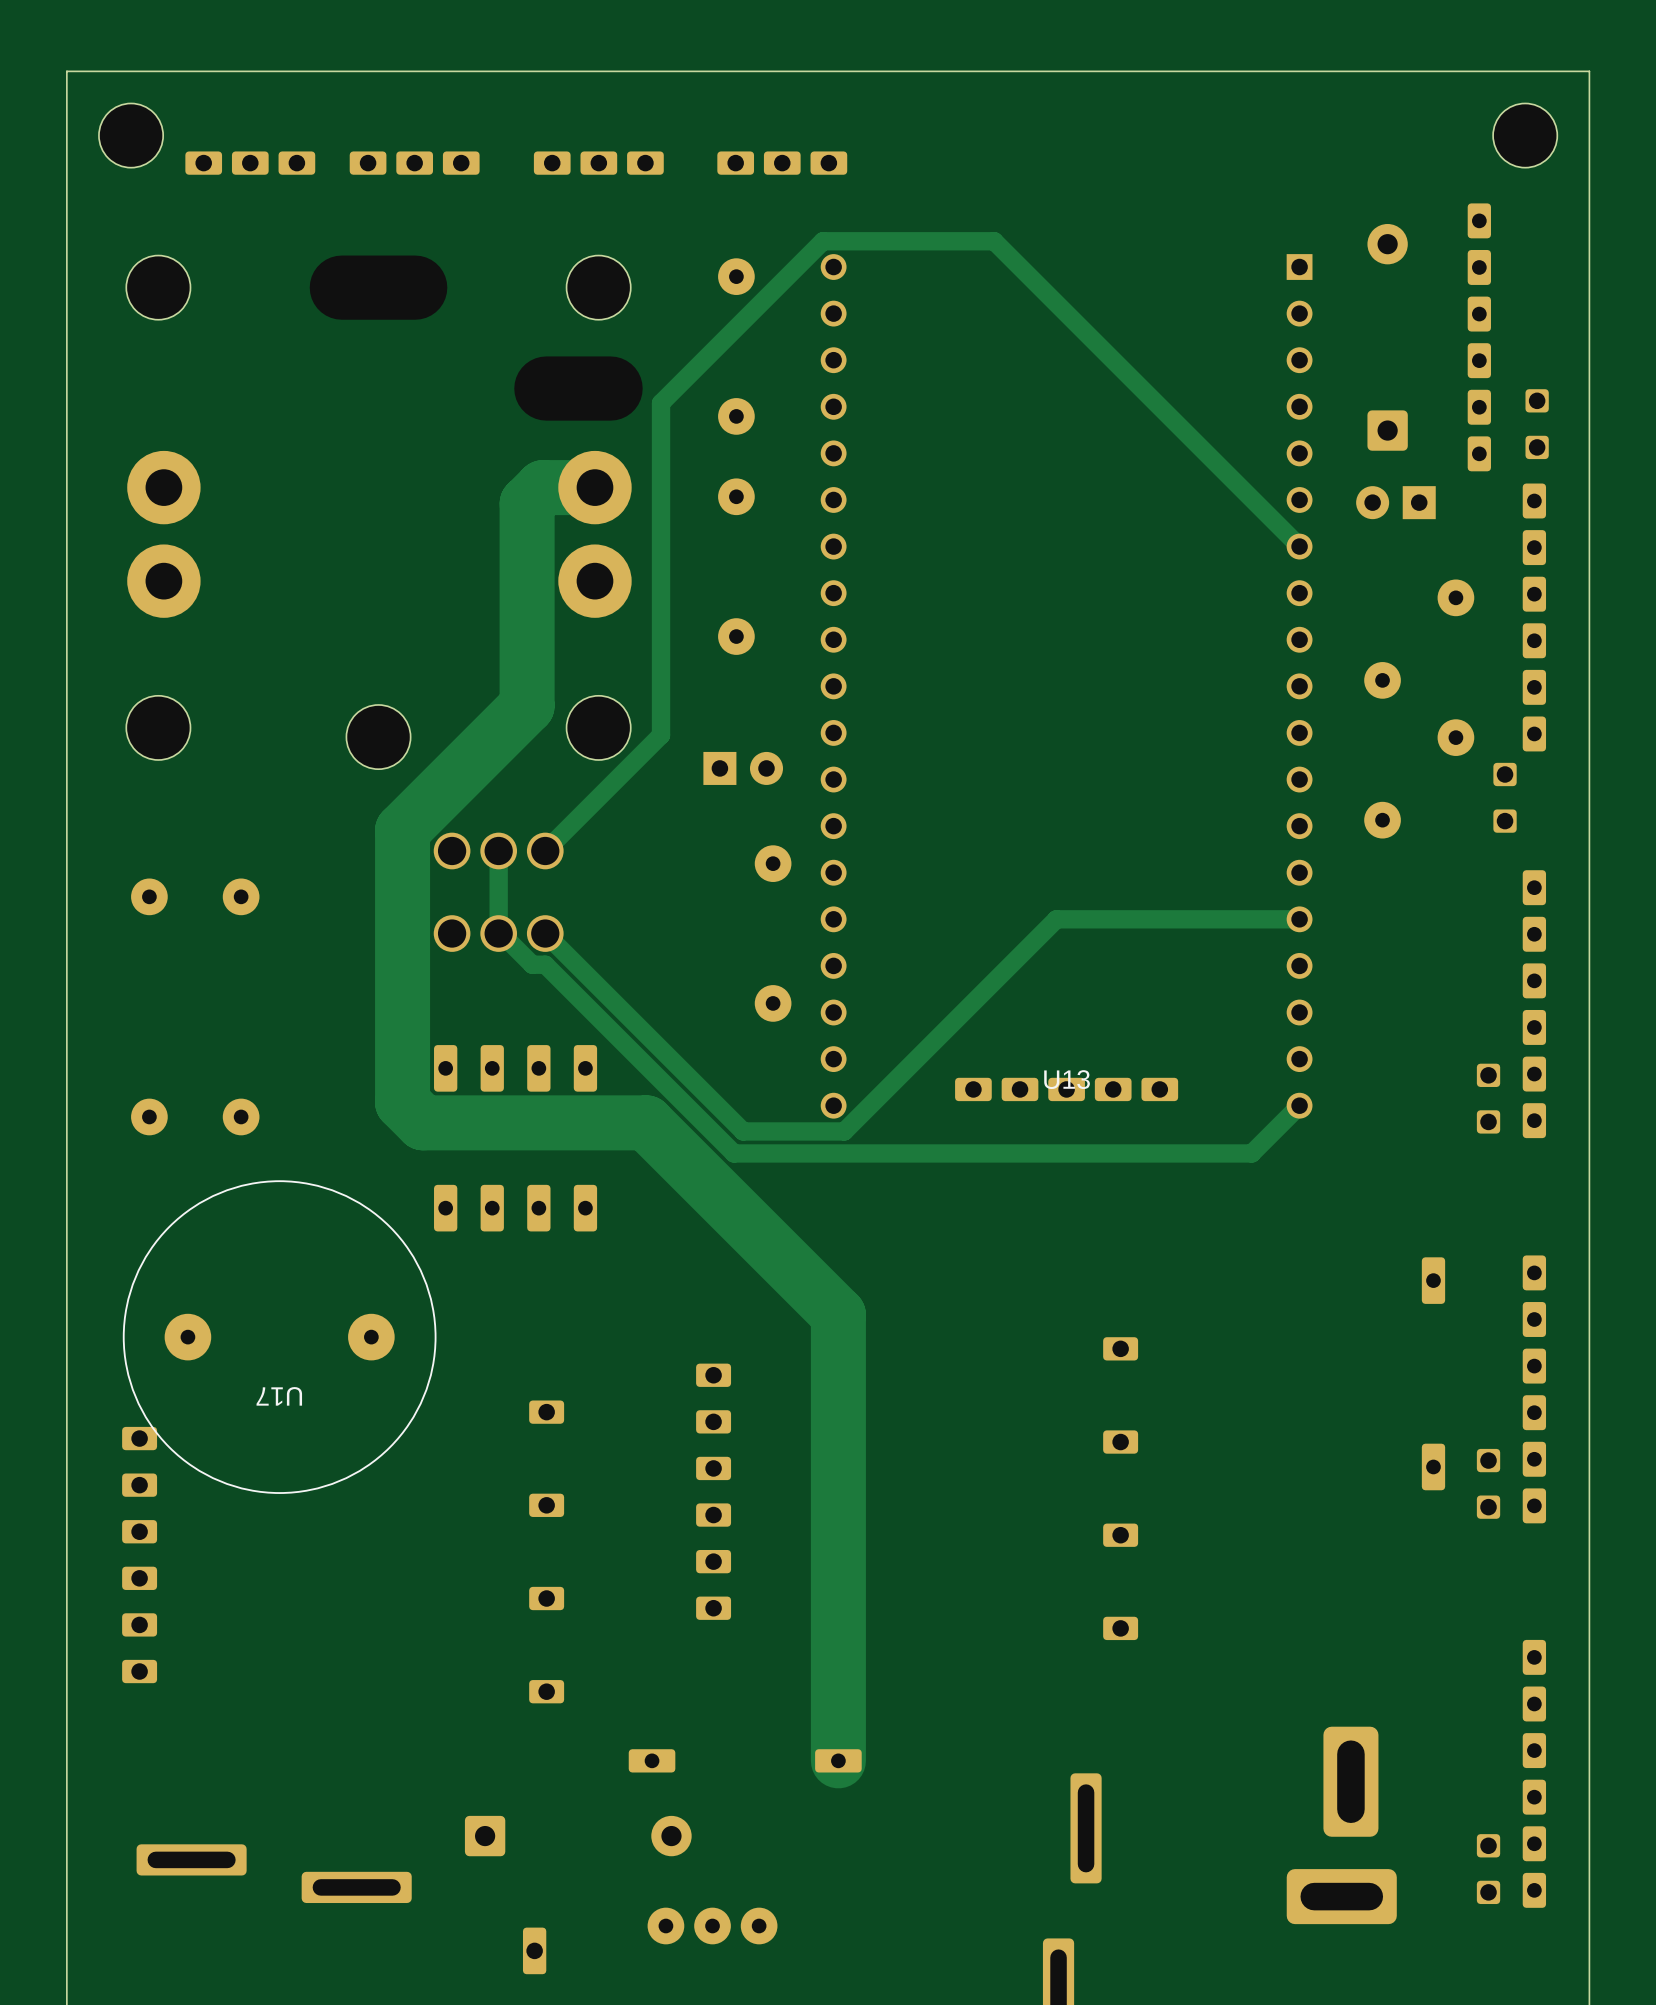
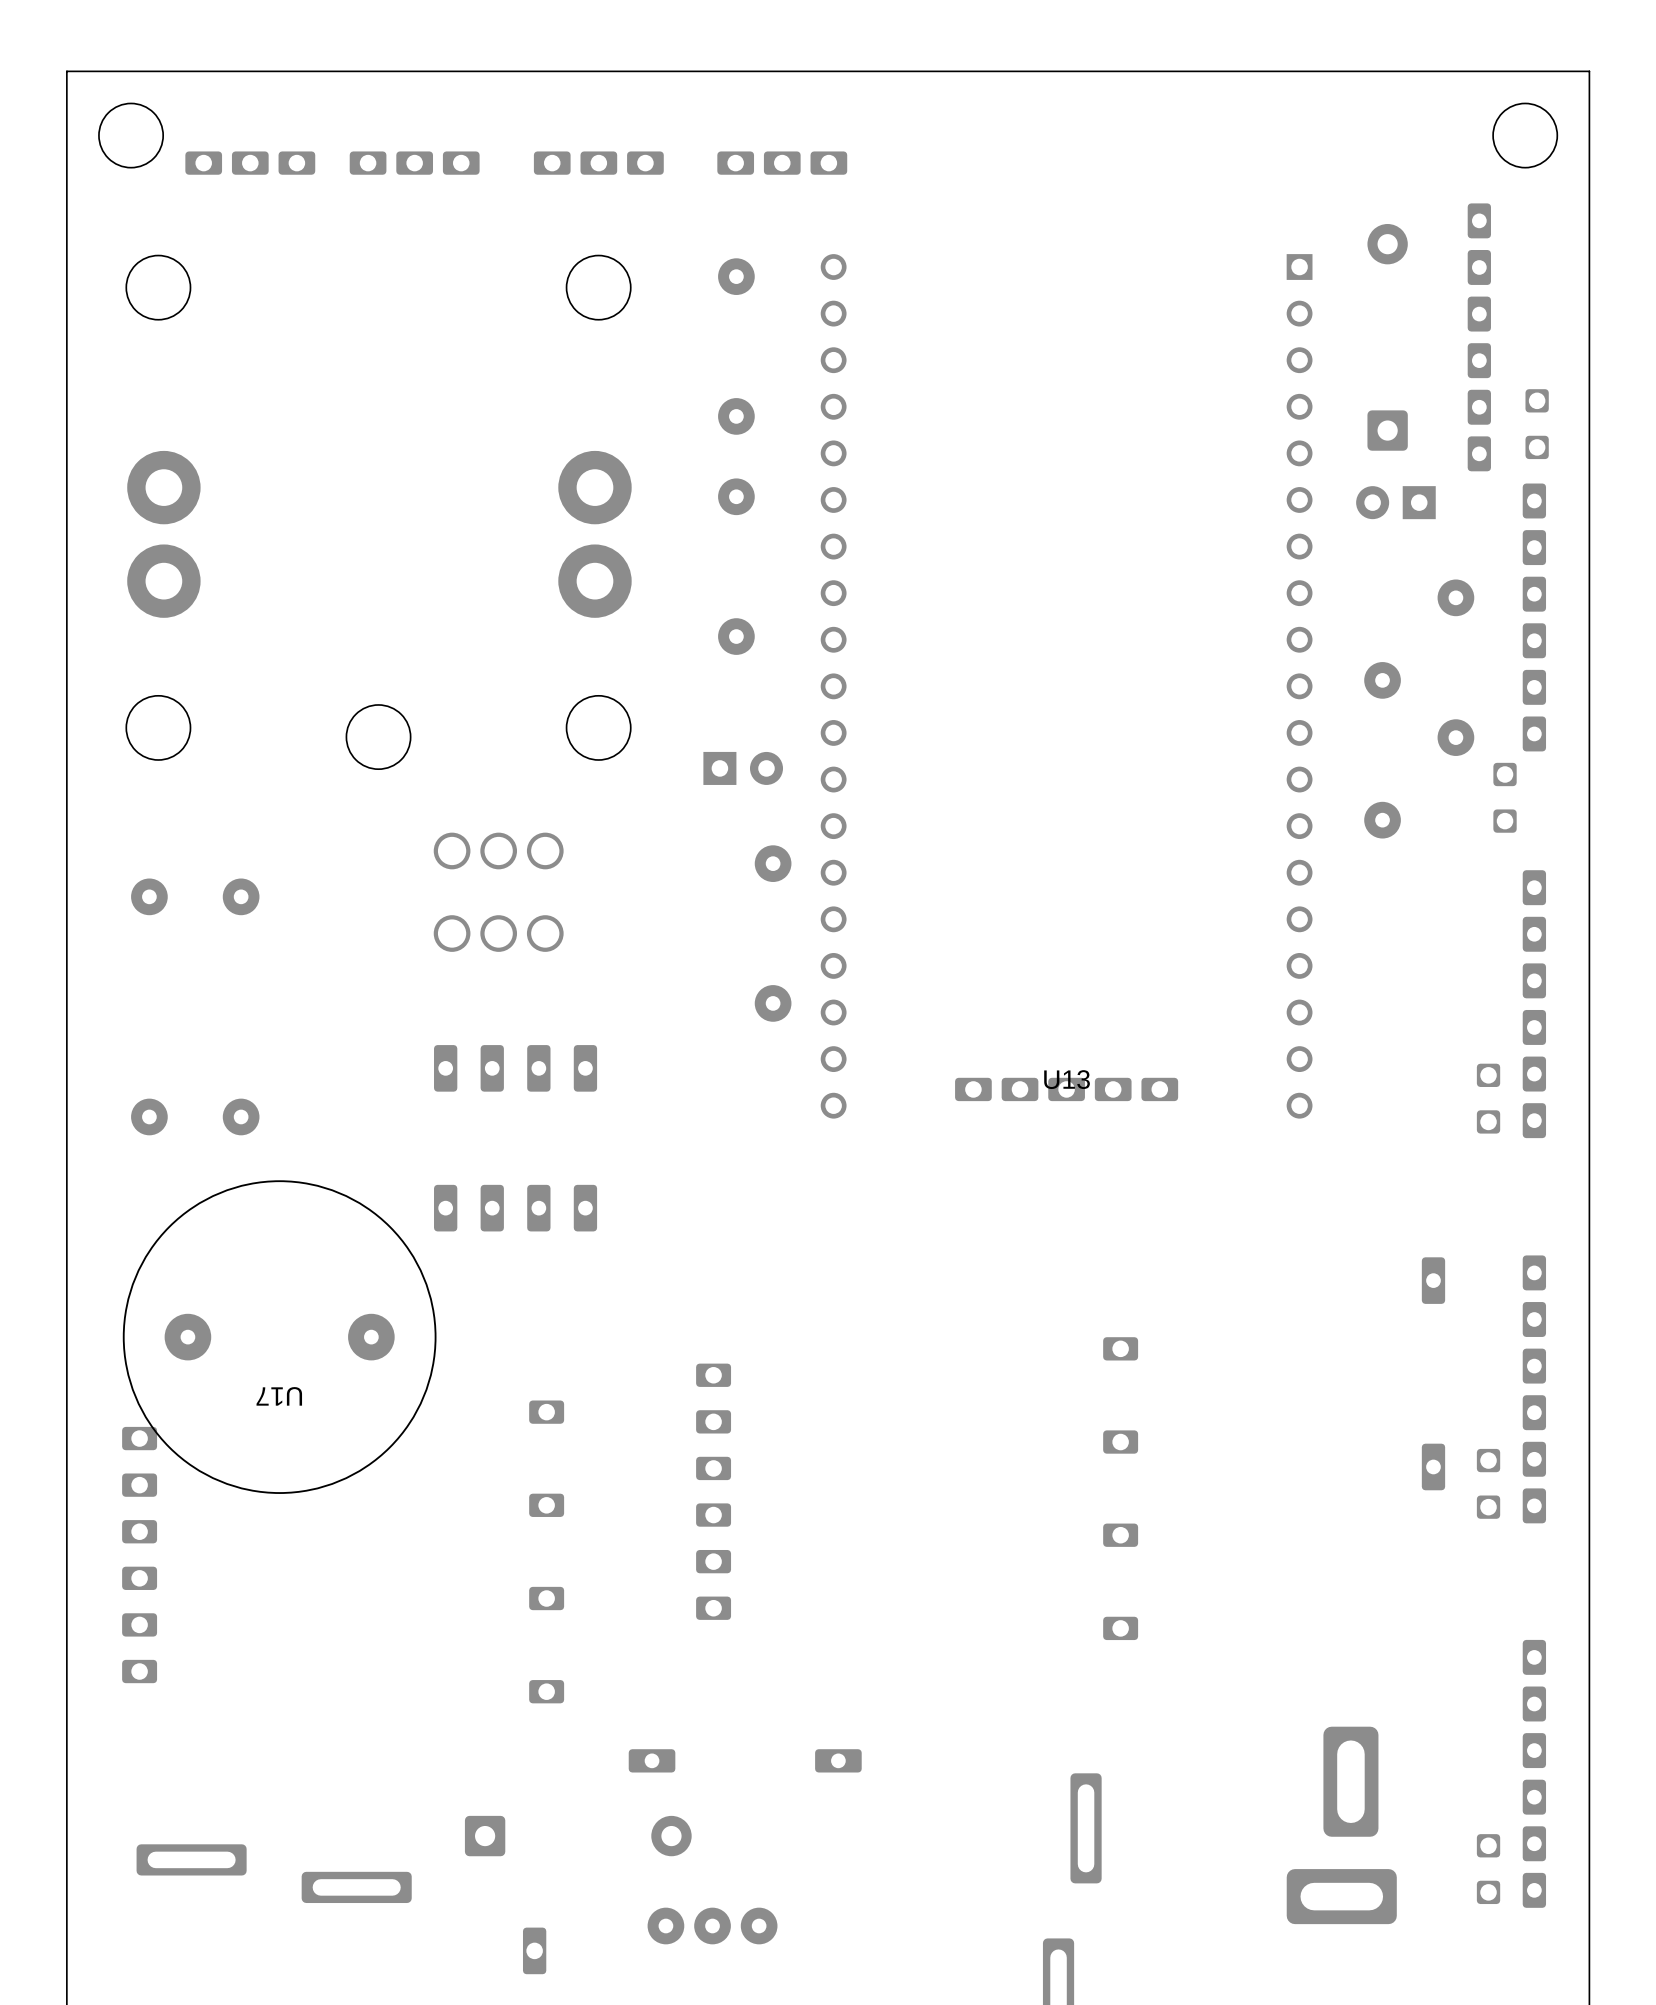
track: (594, 487) (543, 487) (527, 503) (527, 705) (402, 830) (402, 1102) (423, 1122) (646, 1122) (838, 1314) (838, 1760) -> none
track: (1299, 546) (994, 241) (822, 241) (661, 403) (661, 735) (545, 850) -> none
track: (498, 850) (498, 931) (532, 964) (545, 964) (734, 1153) (1251, 1153) (1299, 1105) -> none
track: (1299, 919) (1056, 919) (844, 1131) (743, 1131) (545, 933) -> none

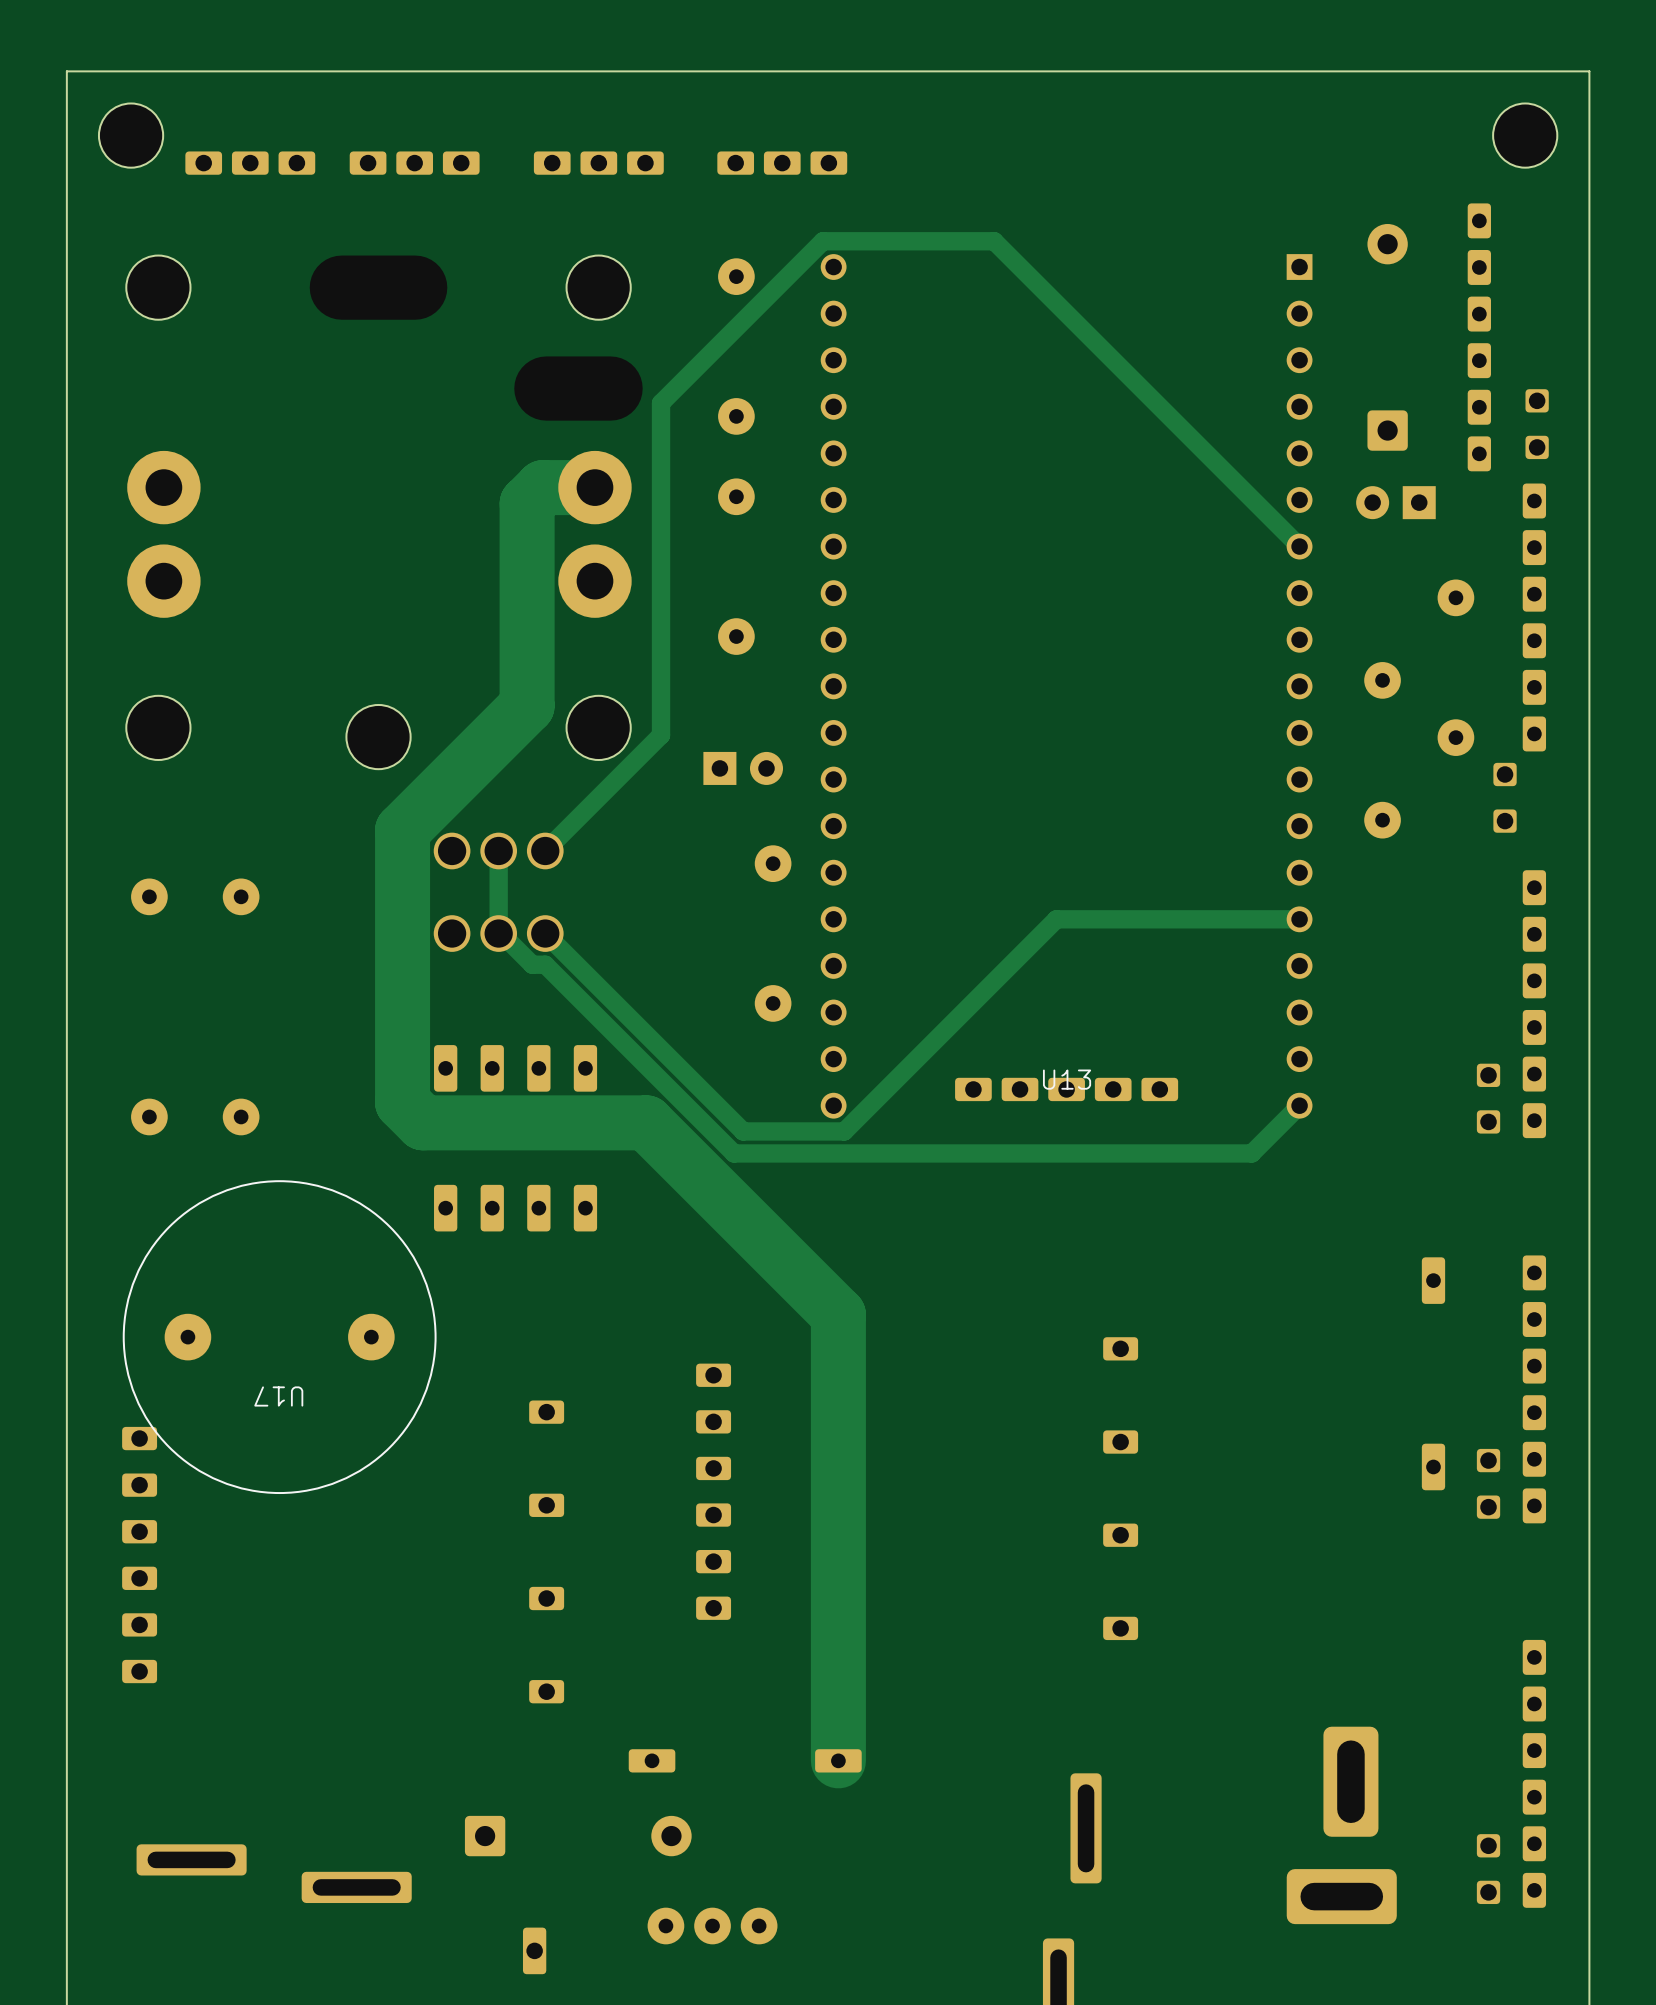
track: none -> (594, 487) (543, 487) (527, 503) (527, 705) (402, 830) (402, 1102) (423, 1122) (646, 1122) (838, 1314) (838, 1760)
track: none -> (1299, 546) (994, 241) (822, 241) (661, 403) (661, 735) (545, 850)
track: none -> (498, 850) (498, 931) (532, 964) (545, 964) (734, 1153) (1251, 1153) (1299, 1105)
track: none -> (1299, 919) (1056, 919) (844, 1131) (743, 1131) (545, 933)

